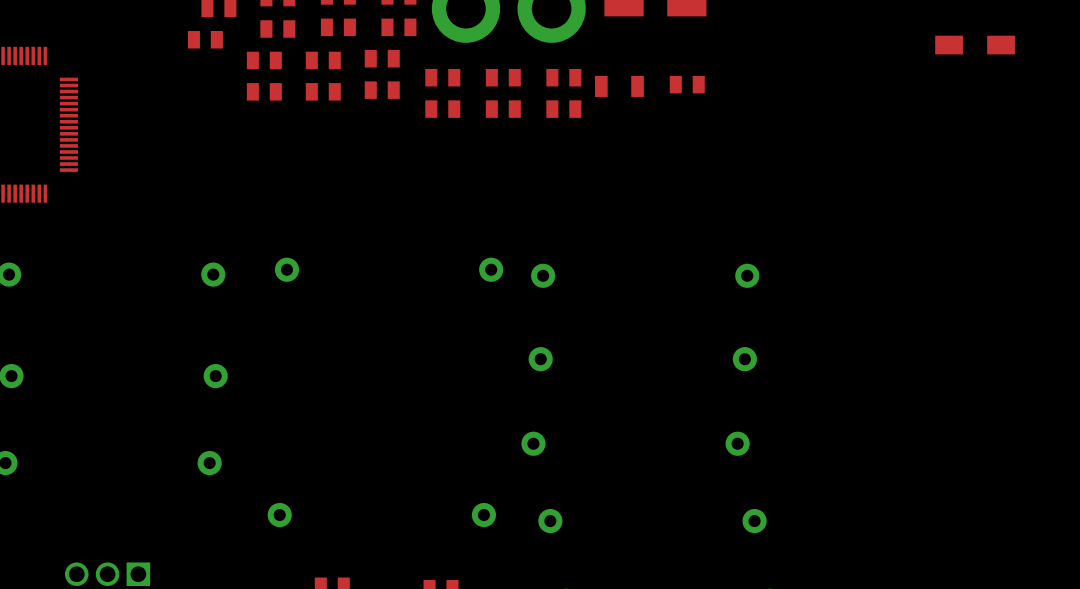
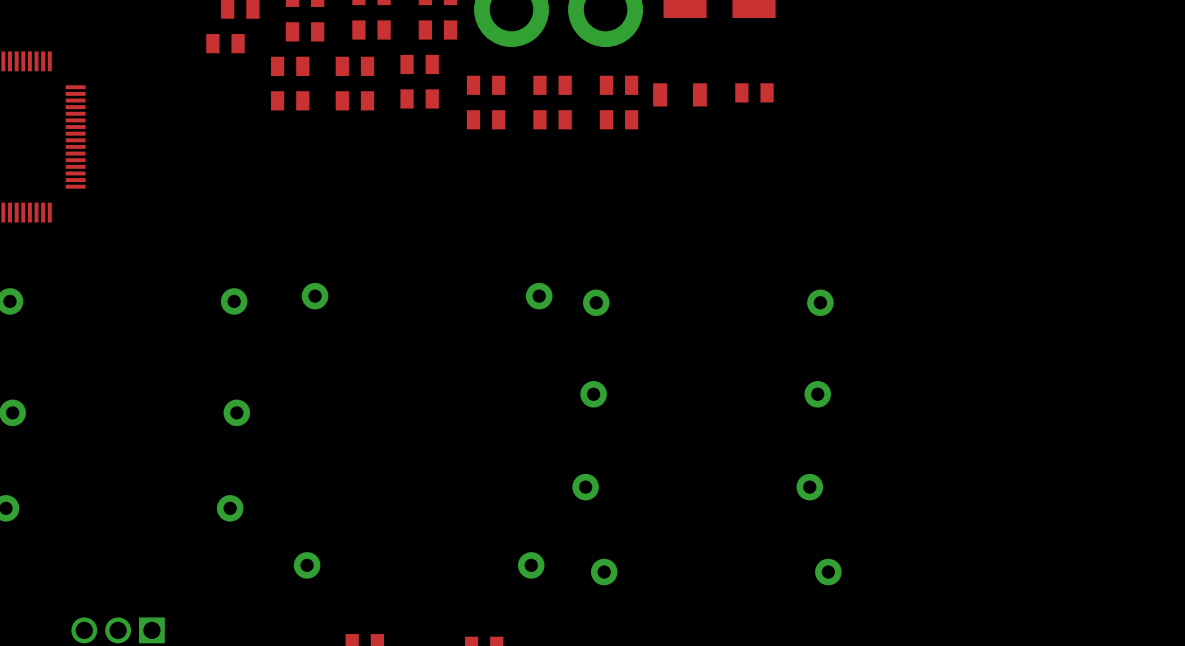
part: (975, 45) -> none

